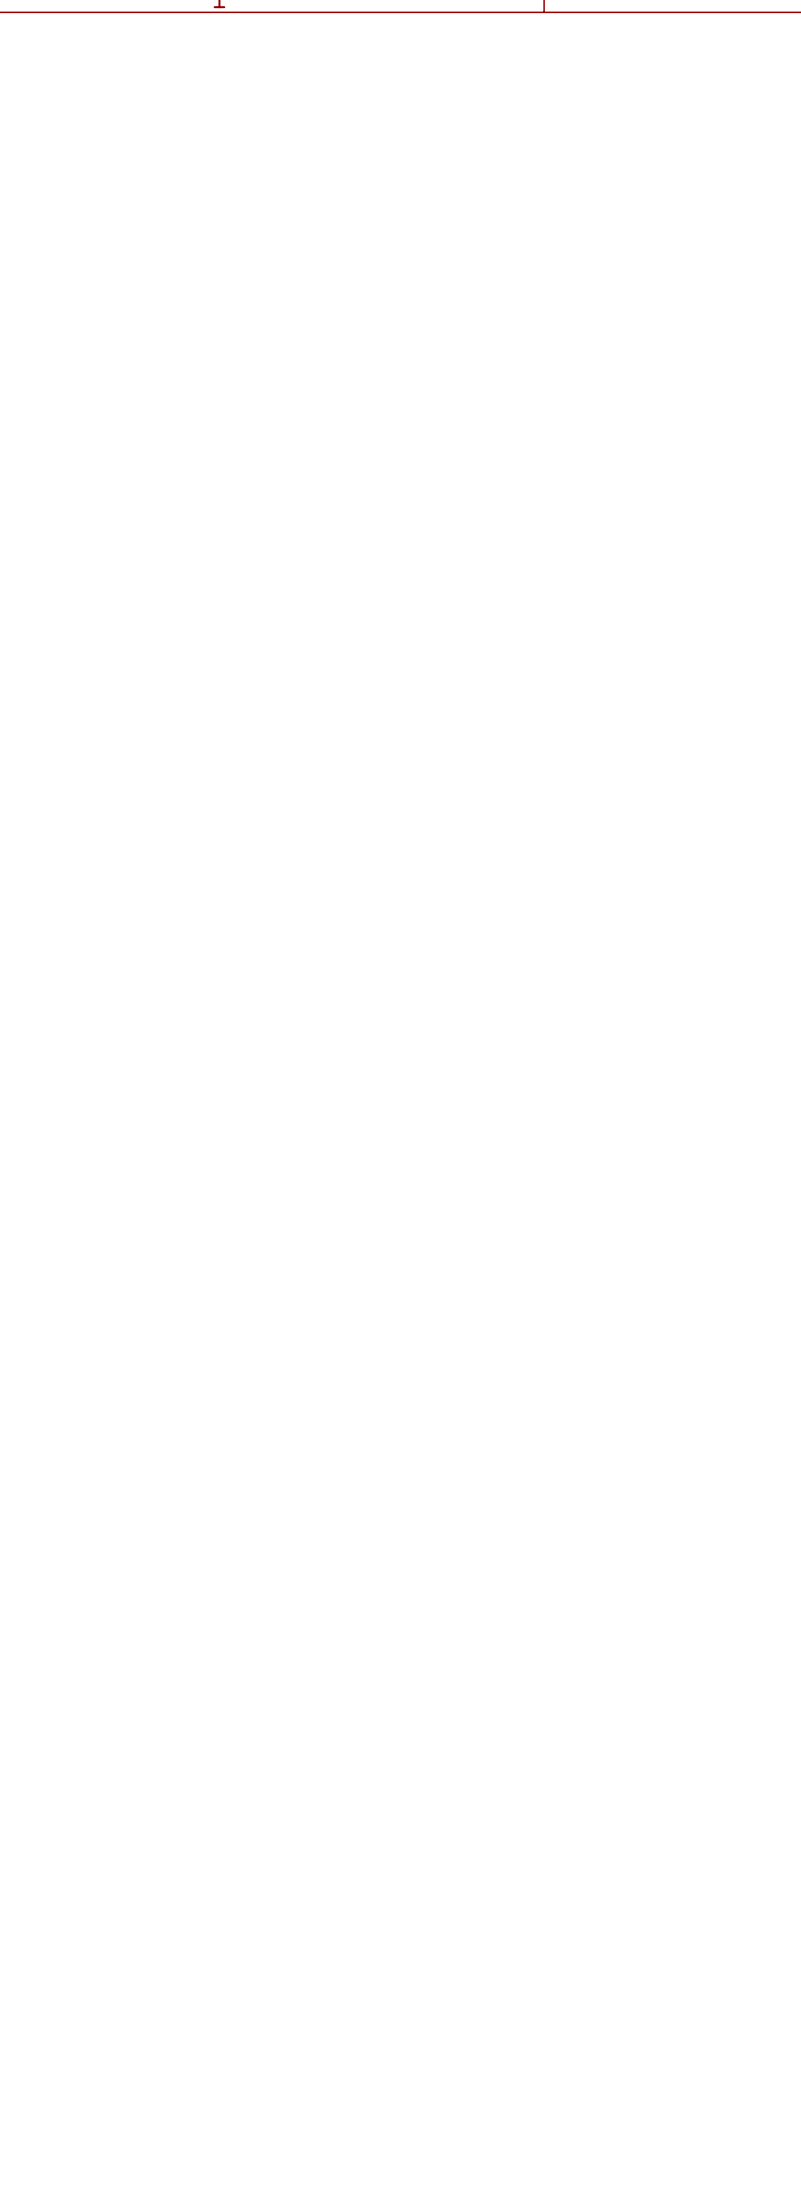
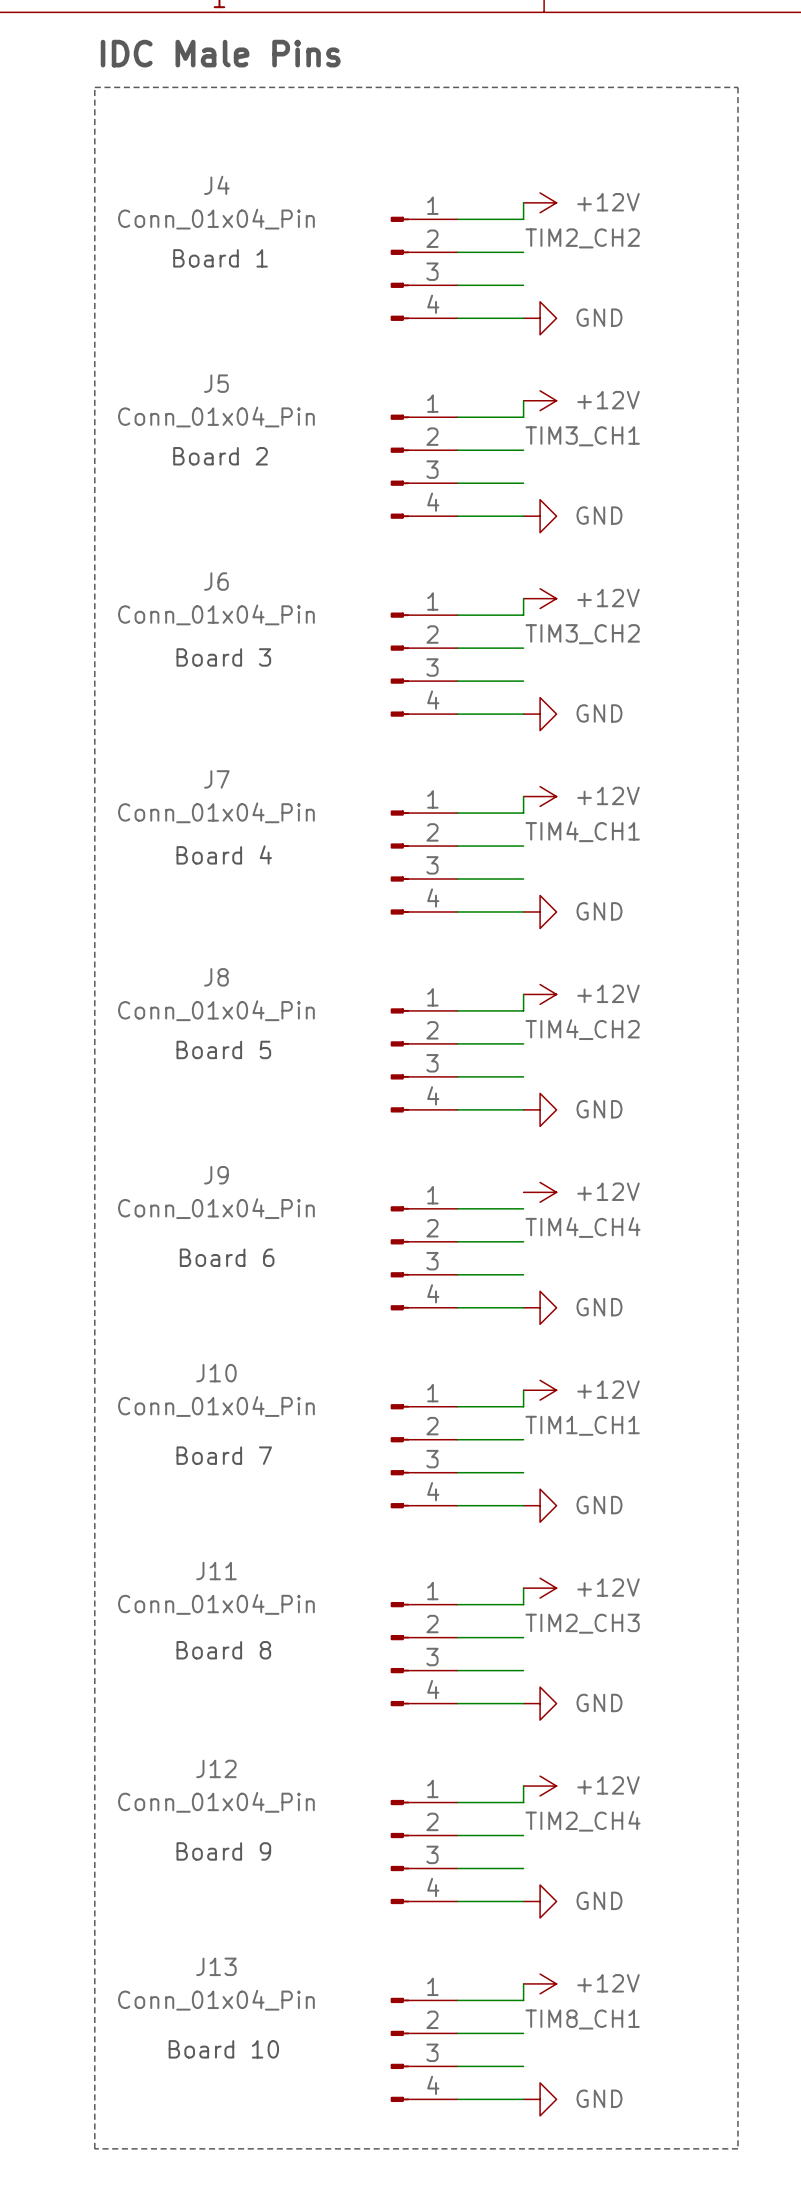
text: none -> IDC Male Pins (220, 53)
line: none -> (94, 87) (737, 87) (737, 2148) (94, 2148) (94, 87)
wire: none -> (523, 202) (523, 219) (457, 219)
power symbol: none -> +12V (540, 202)
label: none -> TIM2_CH2 (582, 238)
wire: none -> (457, 252) (523, 252)
text: none -> Board 1 (220, 258)
J4: none -> Conn_01x04_Pin (424, 268)
wire: none -> (457, 285) (523, 285)
wire: none -> (457, 318) (523, 318)
power symbol: none -> GND (540, 318)
wire: none -> (523, 400) (523, 417) (457, 417)
power symbol: none -> +12V (540, 400)
label: none -> TIM3_CH1 (582, 436)
wire: none -> (457, 450) (523, 450)
text: none -> Board 2 (220, 456)
J5: none -> Conn_01x04_Pin (424, 466)
wire: none -> (457, 483) (523, 483)
wire: none -> (457, 516) (523, 516)
power symbol: none -> GND (540, 516)
wire: none -> (523, 598) (523, 615) (457, 615)
power symbol: none -> +12V (540, 598)
label: none -> TIM3_CH2 (582, 634)
wire: none -> (457, 648) (523, 648)
text: none -> Board 3 (223, 657)
J6: none -> Conn_01x04_Pin (424, 664)
wire: none -> (457, 681) (523, 681)
wire: none -> (457, 714) (523, 714)
power symbol: none -> GND (540, 714)
wire: none -> (523, 796) (523, 813) (457, 813)
power symbol: none -> +12V (540, 796)
label: none -> TIM4_CH1 (582, 831)
wire: none -> (457, 846) (523, 846)
text: none -> Board 4 (224, 854)
J7: none -> Conn_01x04_Pin (424, 862)
wire: none -> (457, 879) (523, 879)
wire: none -> (457, 911) (523, 911)
power symbol: none -> GND (540, 911)
wire: none -> (523, 994) (523, 1010) (457, 1010)
power symbol: none -> +12V (540, 994)
label: none -> TIM4_CH2 (582, 1029)
wire: none -> (457, 1043) (523, 1043)
text: none -> Board 5 (223, 1049)
J8: none -> Conn_01x04_Pin (424, 1060)
wire: none -> (457, 1076) (523, 1076)
wire: none -> (457, 1109) (523, 1109)
power symbol: none -> GND (540, 1109)
power symbol: none -> +12V (540, 1192)
wire: none -> (457, 1208) (523, 1208)
label: none -> TIM4_CH4 (583, 1227)
wire: none -> (457, 1241) (523, 1241)
text: none -> Board 6 (227, 1257)
J9: none -> Conn_01x04_Pin (424, 1258)
wire: none -> (457, 1274) (523, 1274)
wire: none -> (457, 1307) (523, 1307)
power symbol: none -> GND (540, 1307)
wire: none -> (523, 1390) (523, 1406) (457, 1406)
power symbol: none -> +12V (540, 1390)
label: none -> TIM1_CH1 (582, 1425)
wire: none -> (457, 1439) (523, 1439)
text: none -> Board 7 (224, 1455)
J10: none -> Conn_01x04_Pin (424, 1456)
wire: none -> (457, 1472) (523, 1472)
wire: none -> (457, 1505) (523, 1505)
power symbol: none -> GND (540, 1505)
wire: none -> (523, 1588) (523, 1604) (457, 1604)
power symbol: none -> +12V (540, 1588)
label: none -> TIM2_CH3 (582, 1623)
wire: none -> (457, 1637) (523, 1637)
text: none -> Board 8 (223, 1650)
J11: none -> Conn_01x04_Pin (424, 1654)
wire: none -> (457, 1670) (523, 1670)
wire: none -> (457, 1703) (523, 1703)
power symbol: none -> GND (540, 1703)
wire: none -> (523, 1786) (523, 1802) (457, 1802)
power symbol: none -> +12V (540, 1786)
label: none -> TIM2_CH4 (583, 1821)
wire: none -> (457, 1835) (523, 1835)
text: none -> Board 9 (223, 1851)
J12: none -> Conn_01x04_Pin (424, 1852)
wire: none -> (457, 1868) (523, 1868)
wire: none -> (457, 1901) (523, 1901)
power symbol: none -> GND (540, 1901)
wire: none -> (523, 1983) (523, 2000) (457, 2000)
power symbol: none -> +12V (540, 1983)
label: none -> TIM8_CH1 (582, 2019)
wire: none -> (457, 2033) (523, 2033)
text: none -> Board 10 (223, 2049)
J13: none -> Conn_01x04_Pin (424, 2049)
wire: none -> (457, 2066) (523, 2066)
wire: none -> (457, 2099) (523, 2099)
power symbol: none -> GND (540, 2099)

